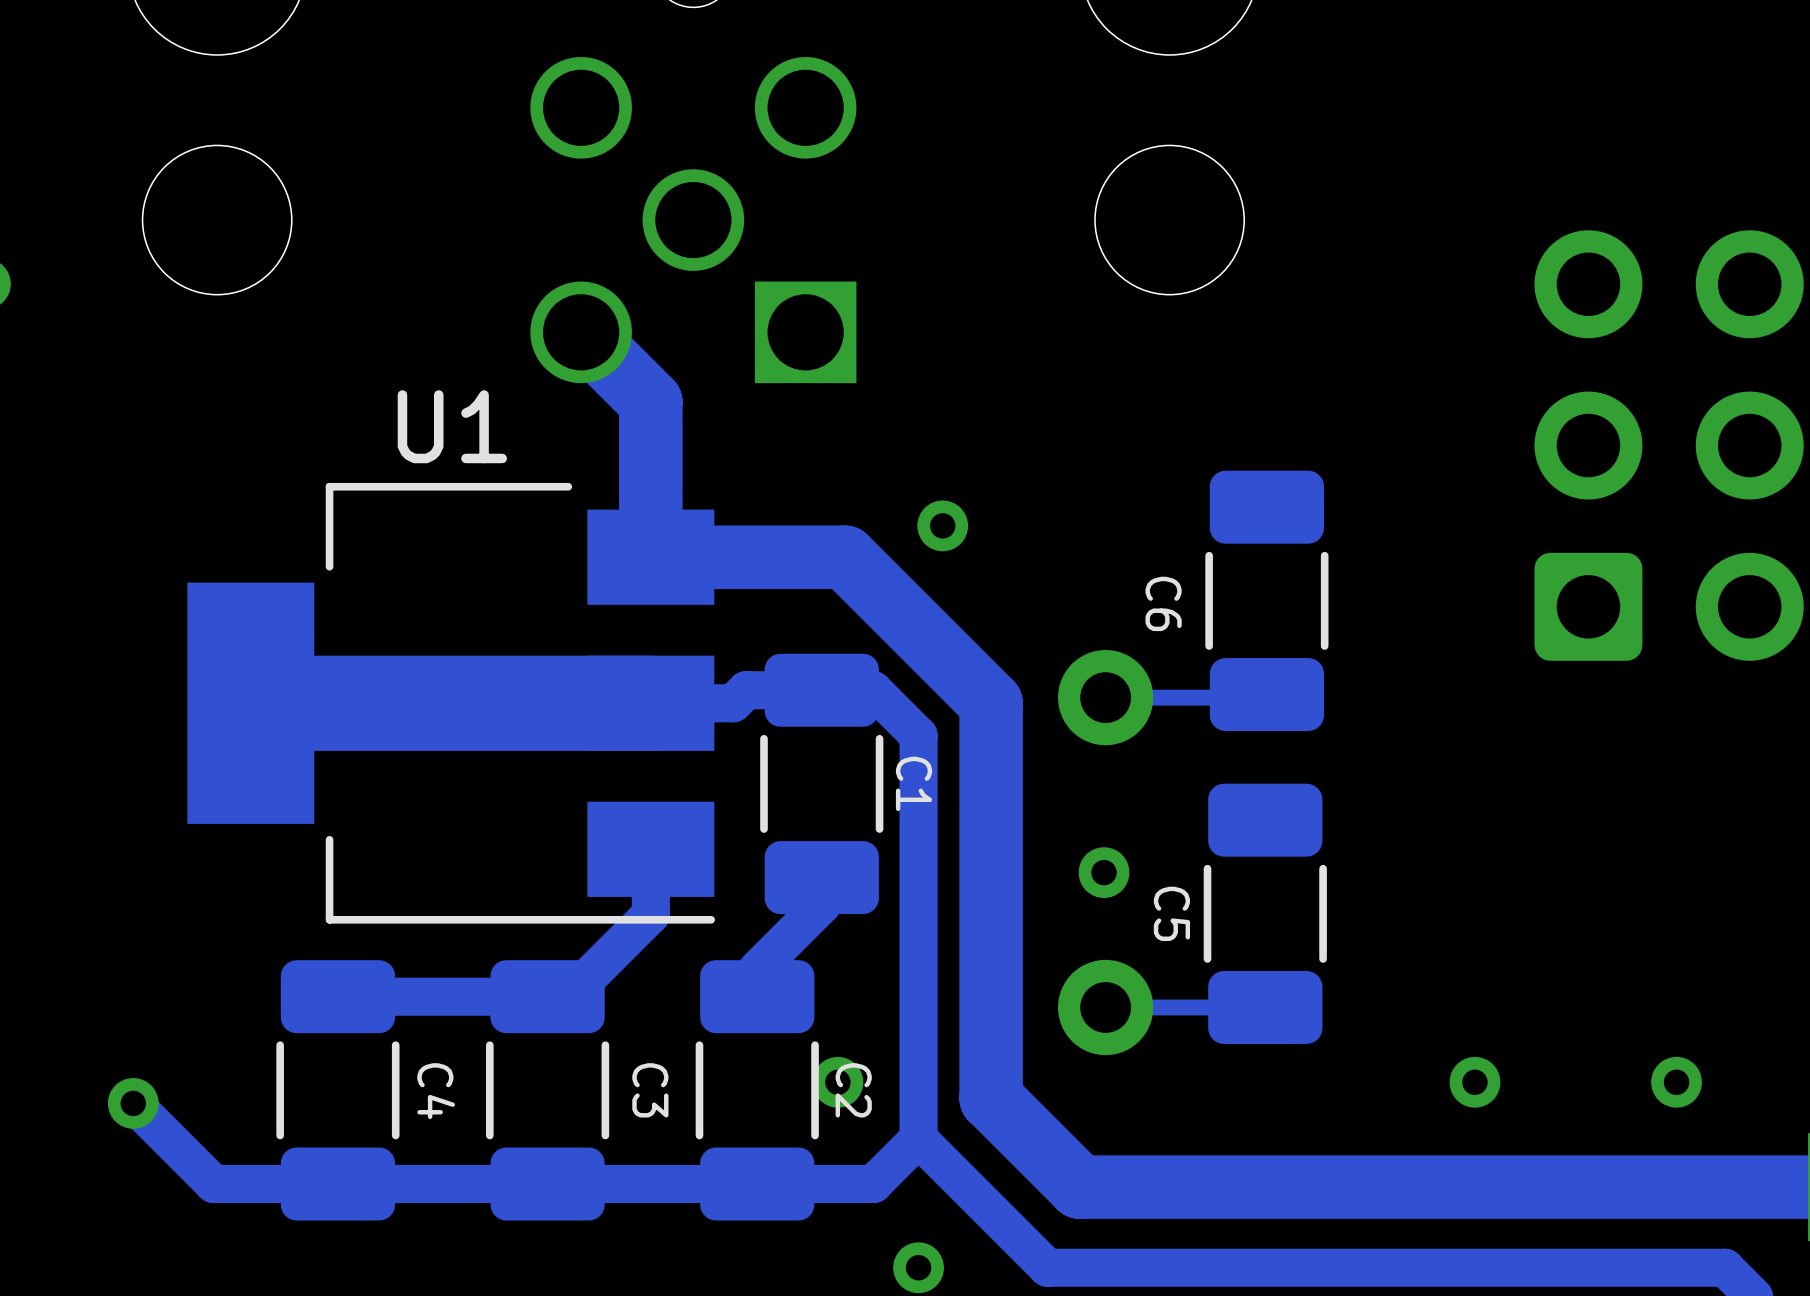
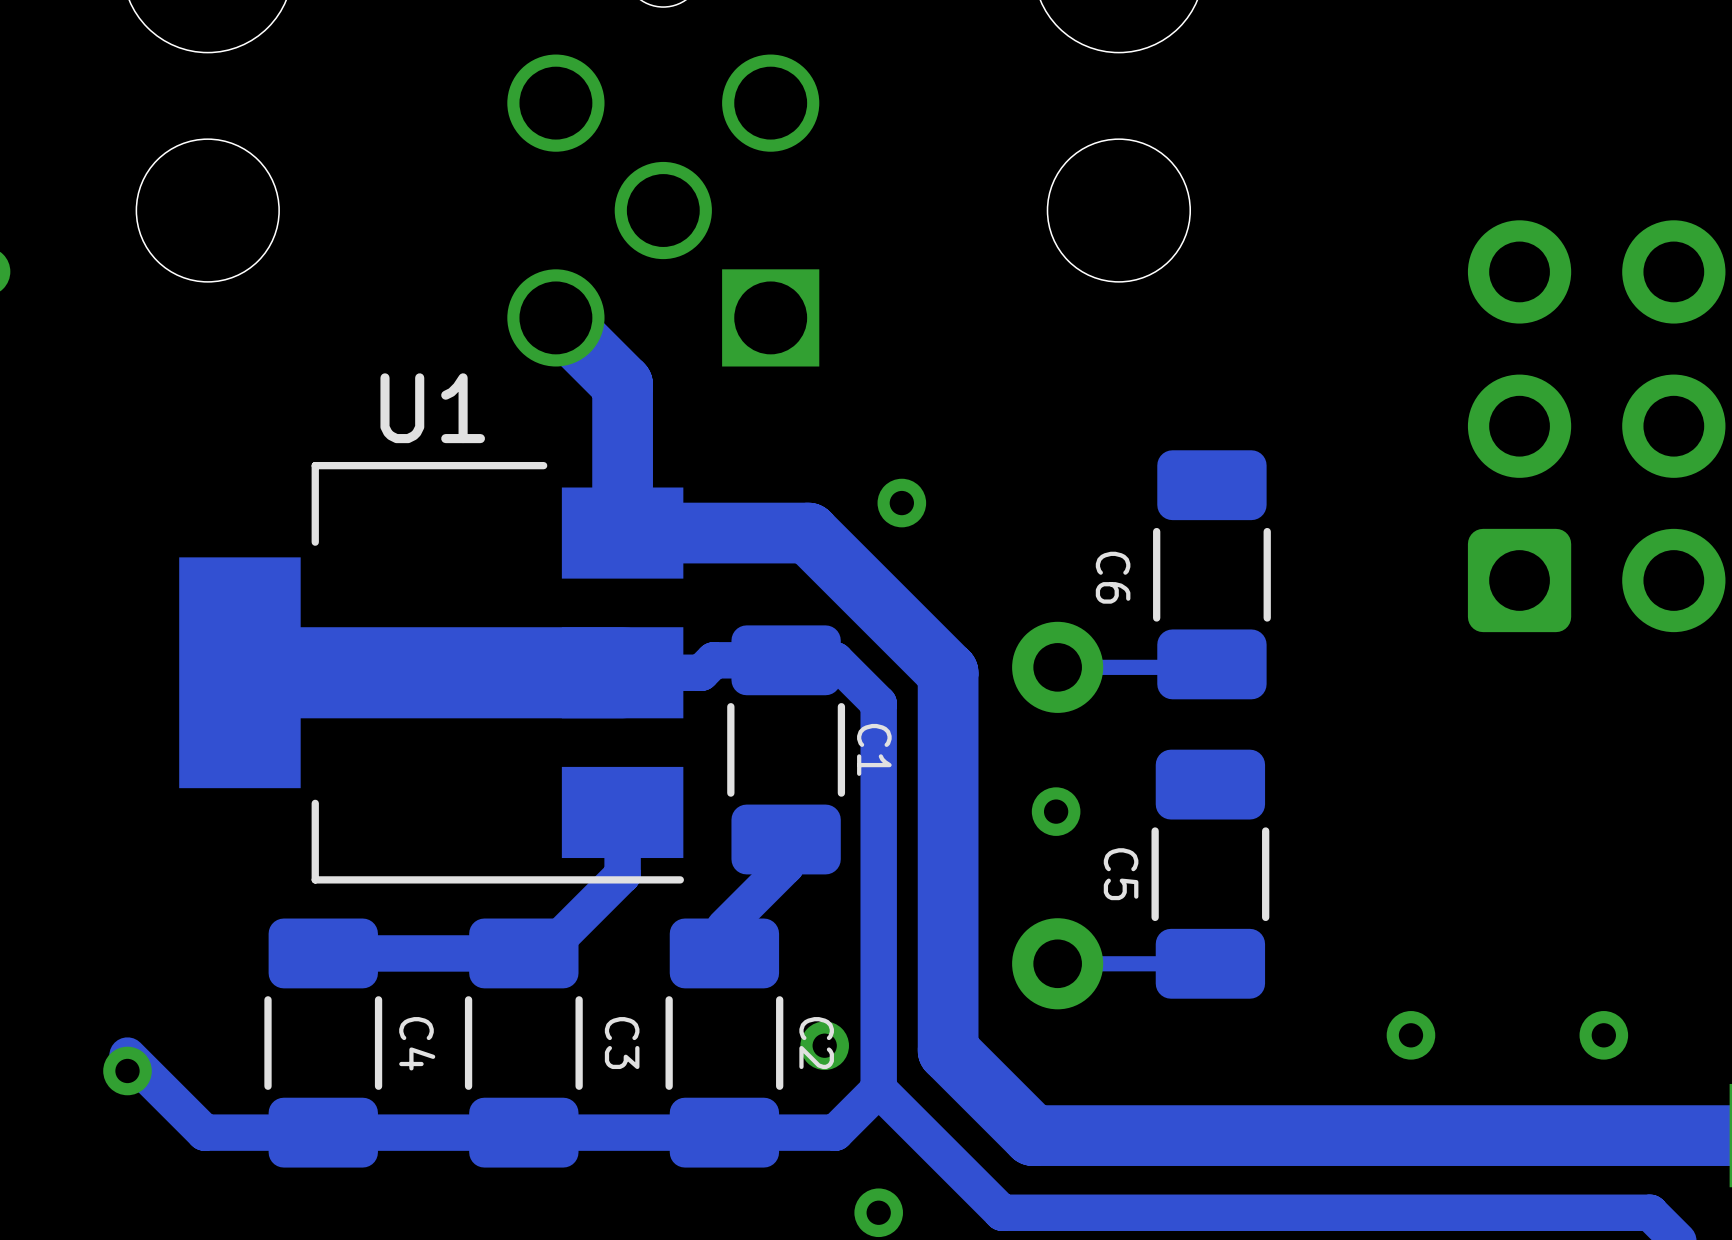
via position: (1104, 872) -> (1056, 811)
via position: (837, 1082) -> (824, 1045)
via position: (133, 1103) -> (127, 1070)

